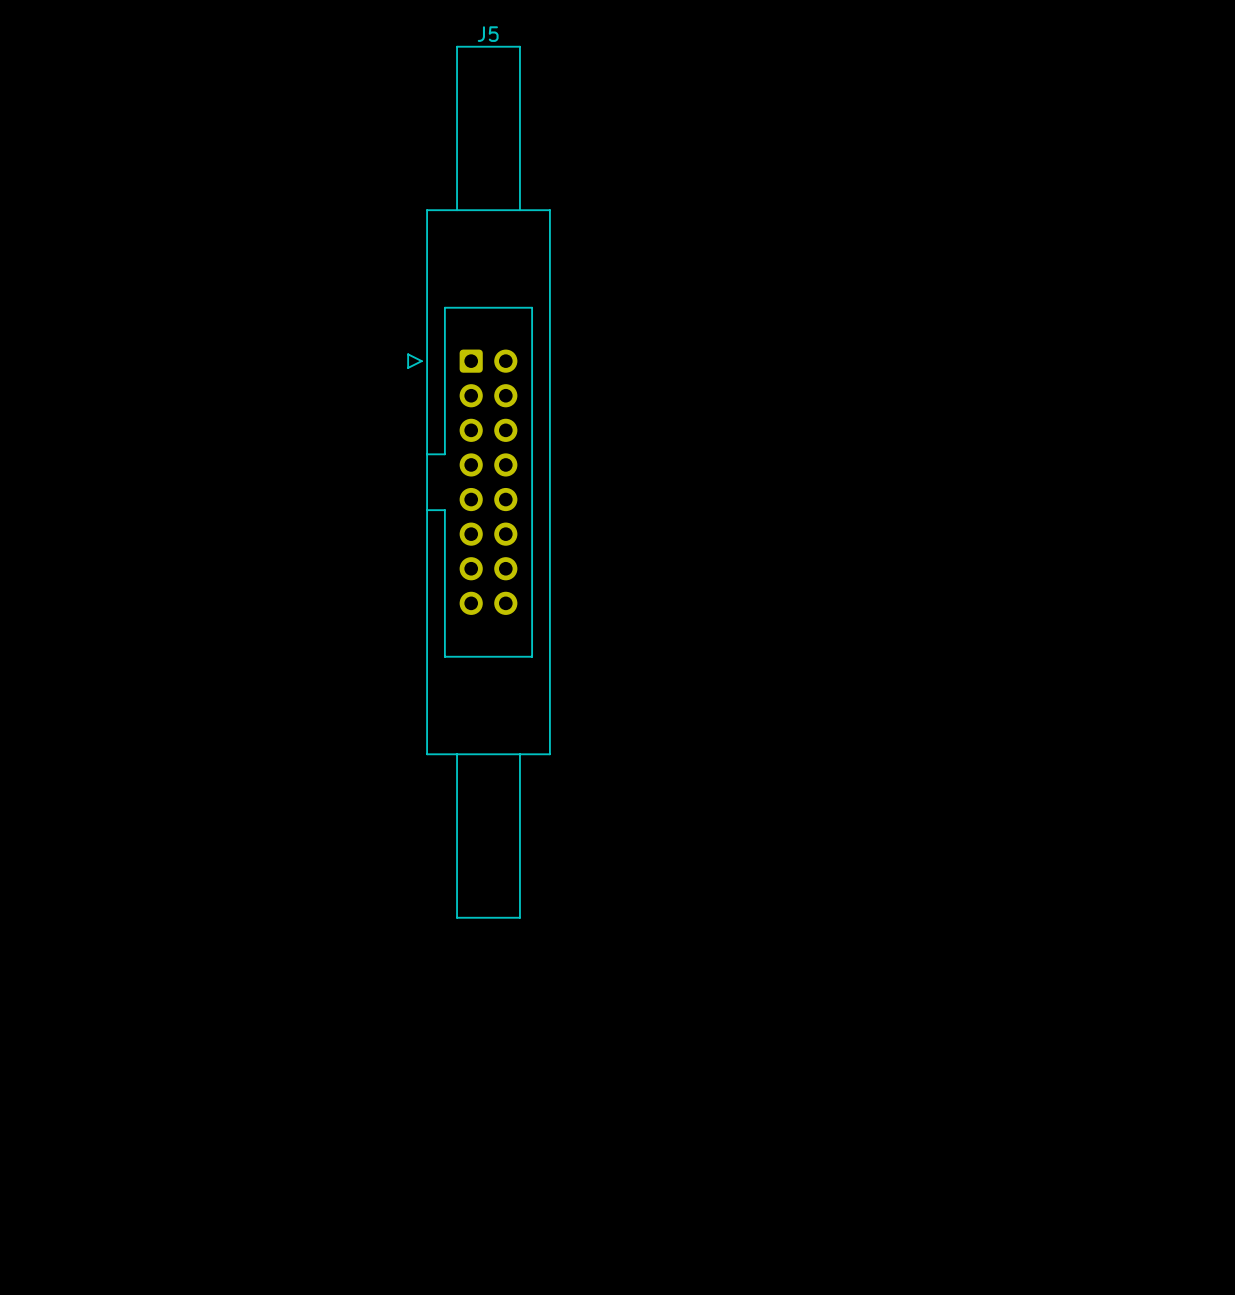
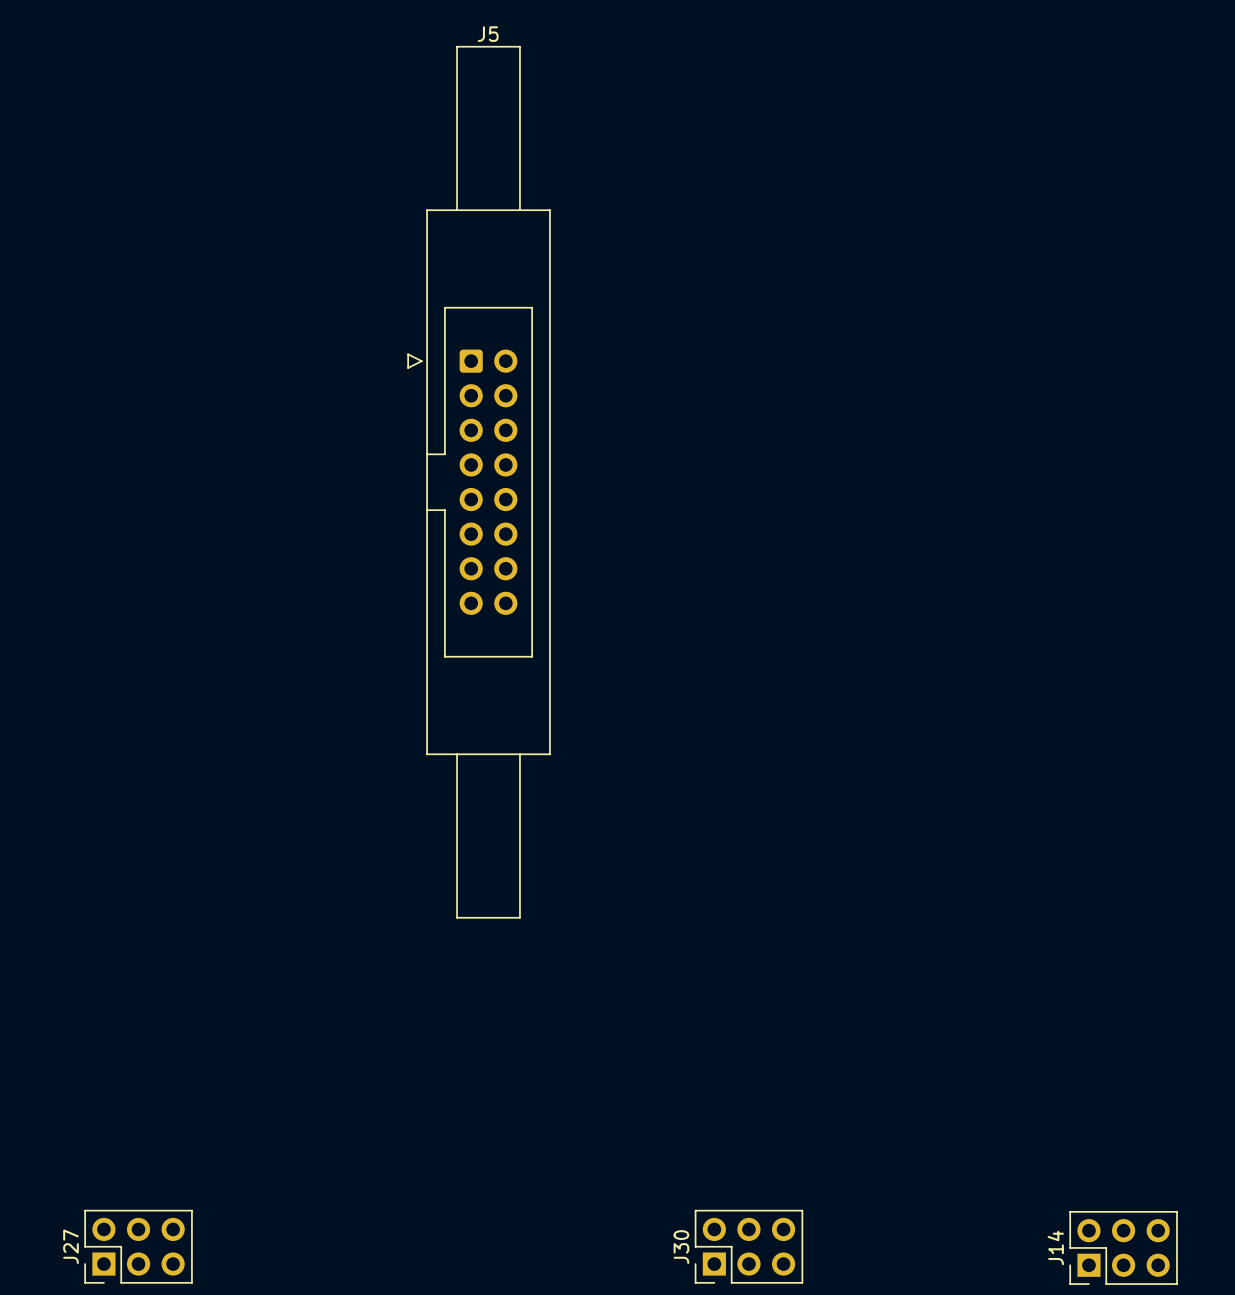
J27: none -> (138, 1246)
J30: none -> (748, 1246)
J14: none -> (1123, 1247)

